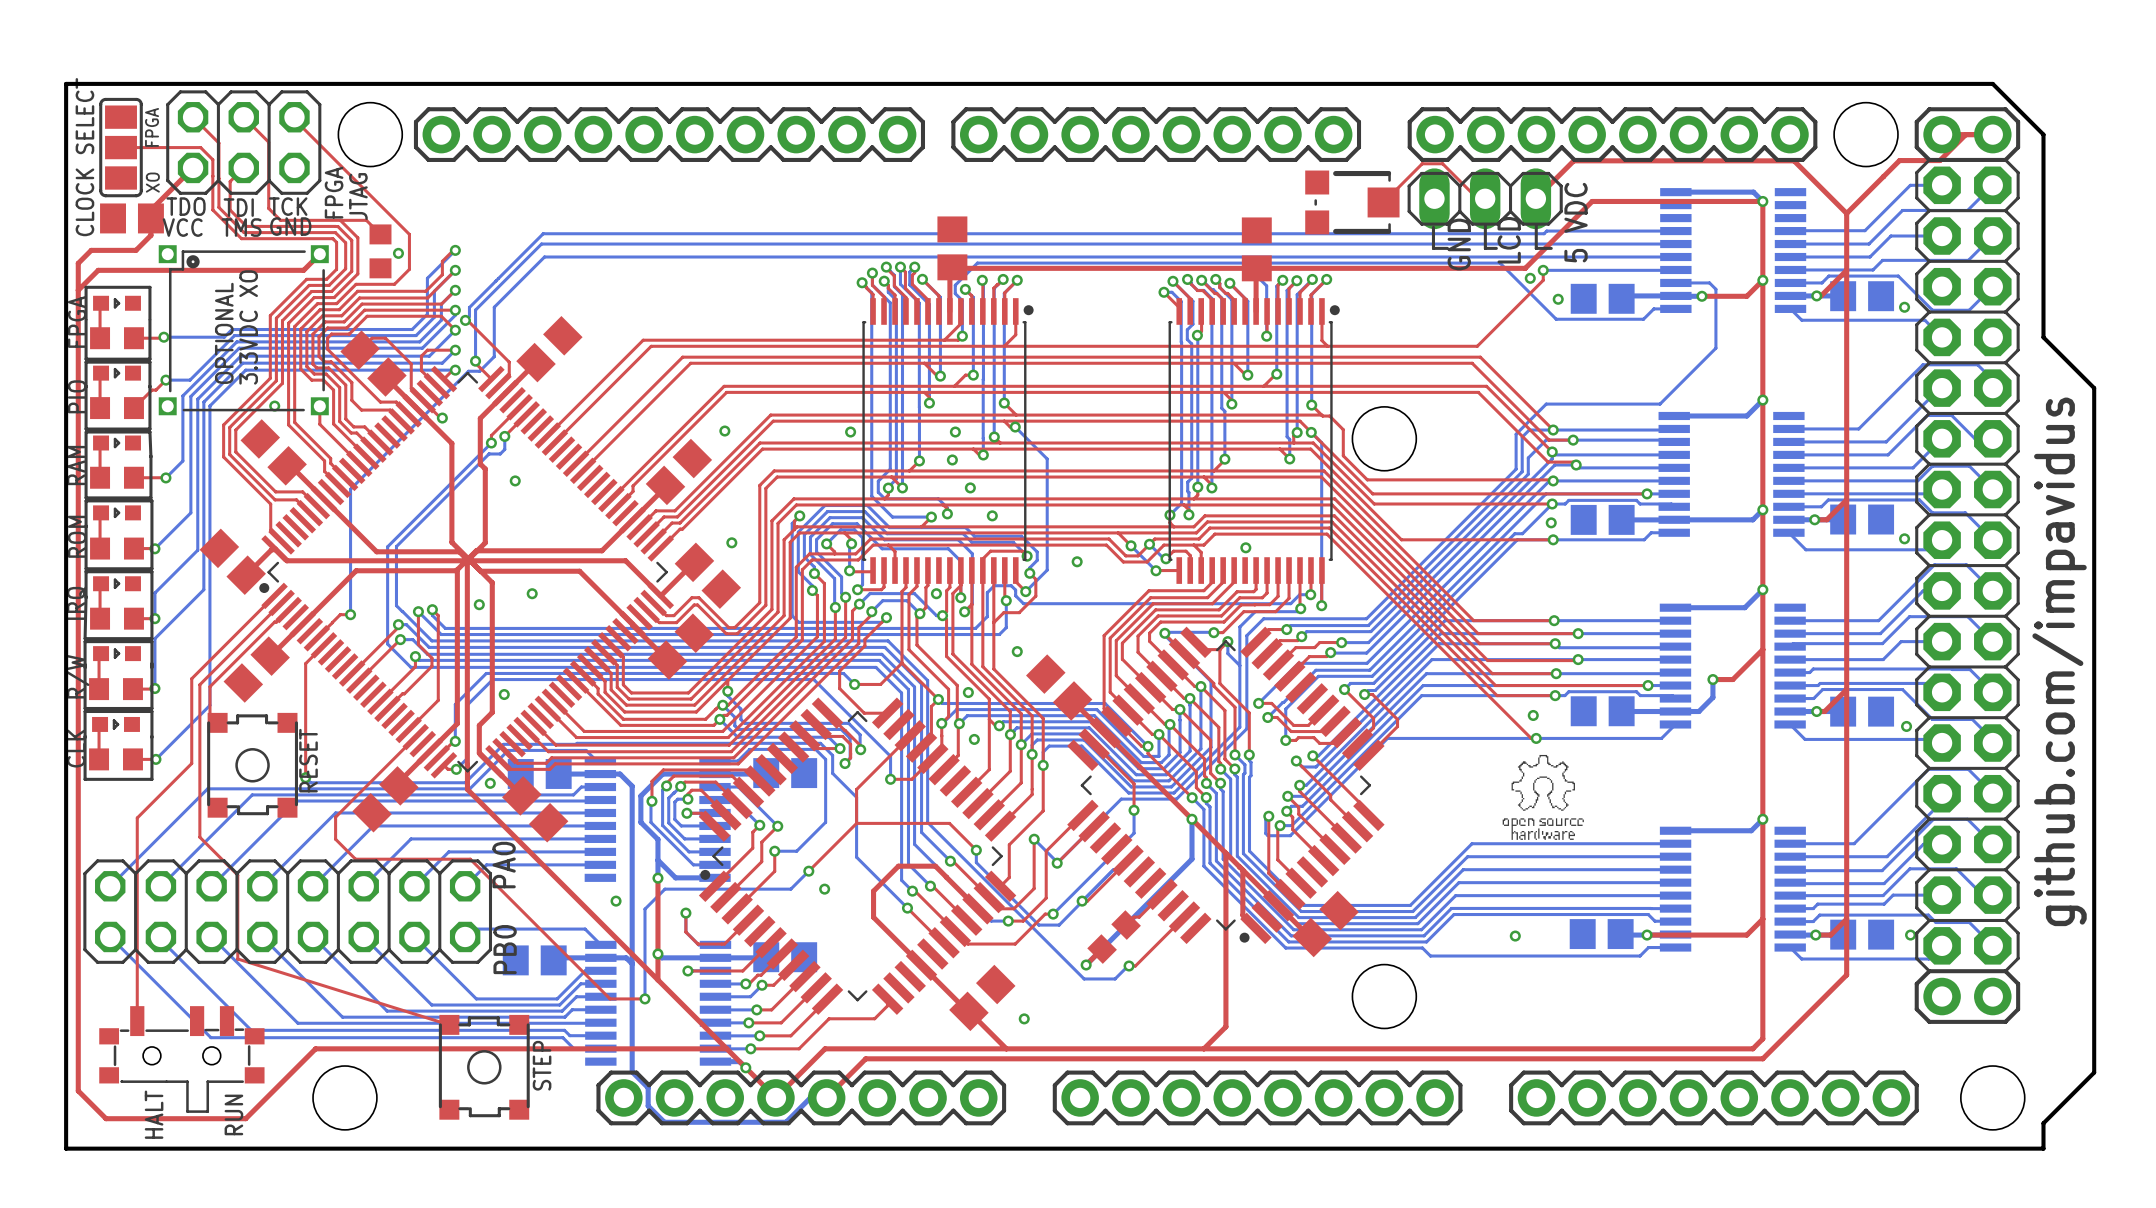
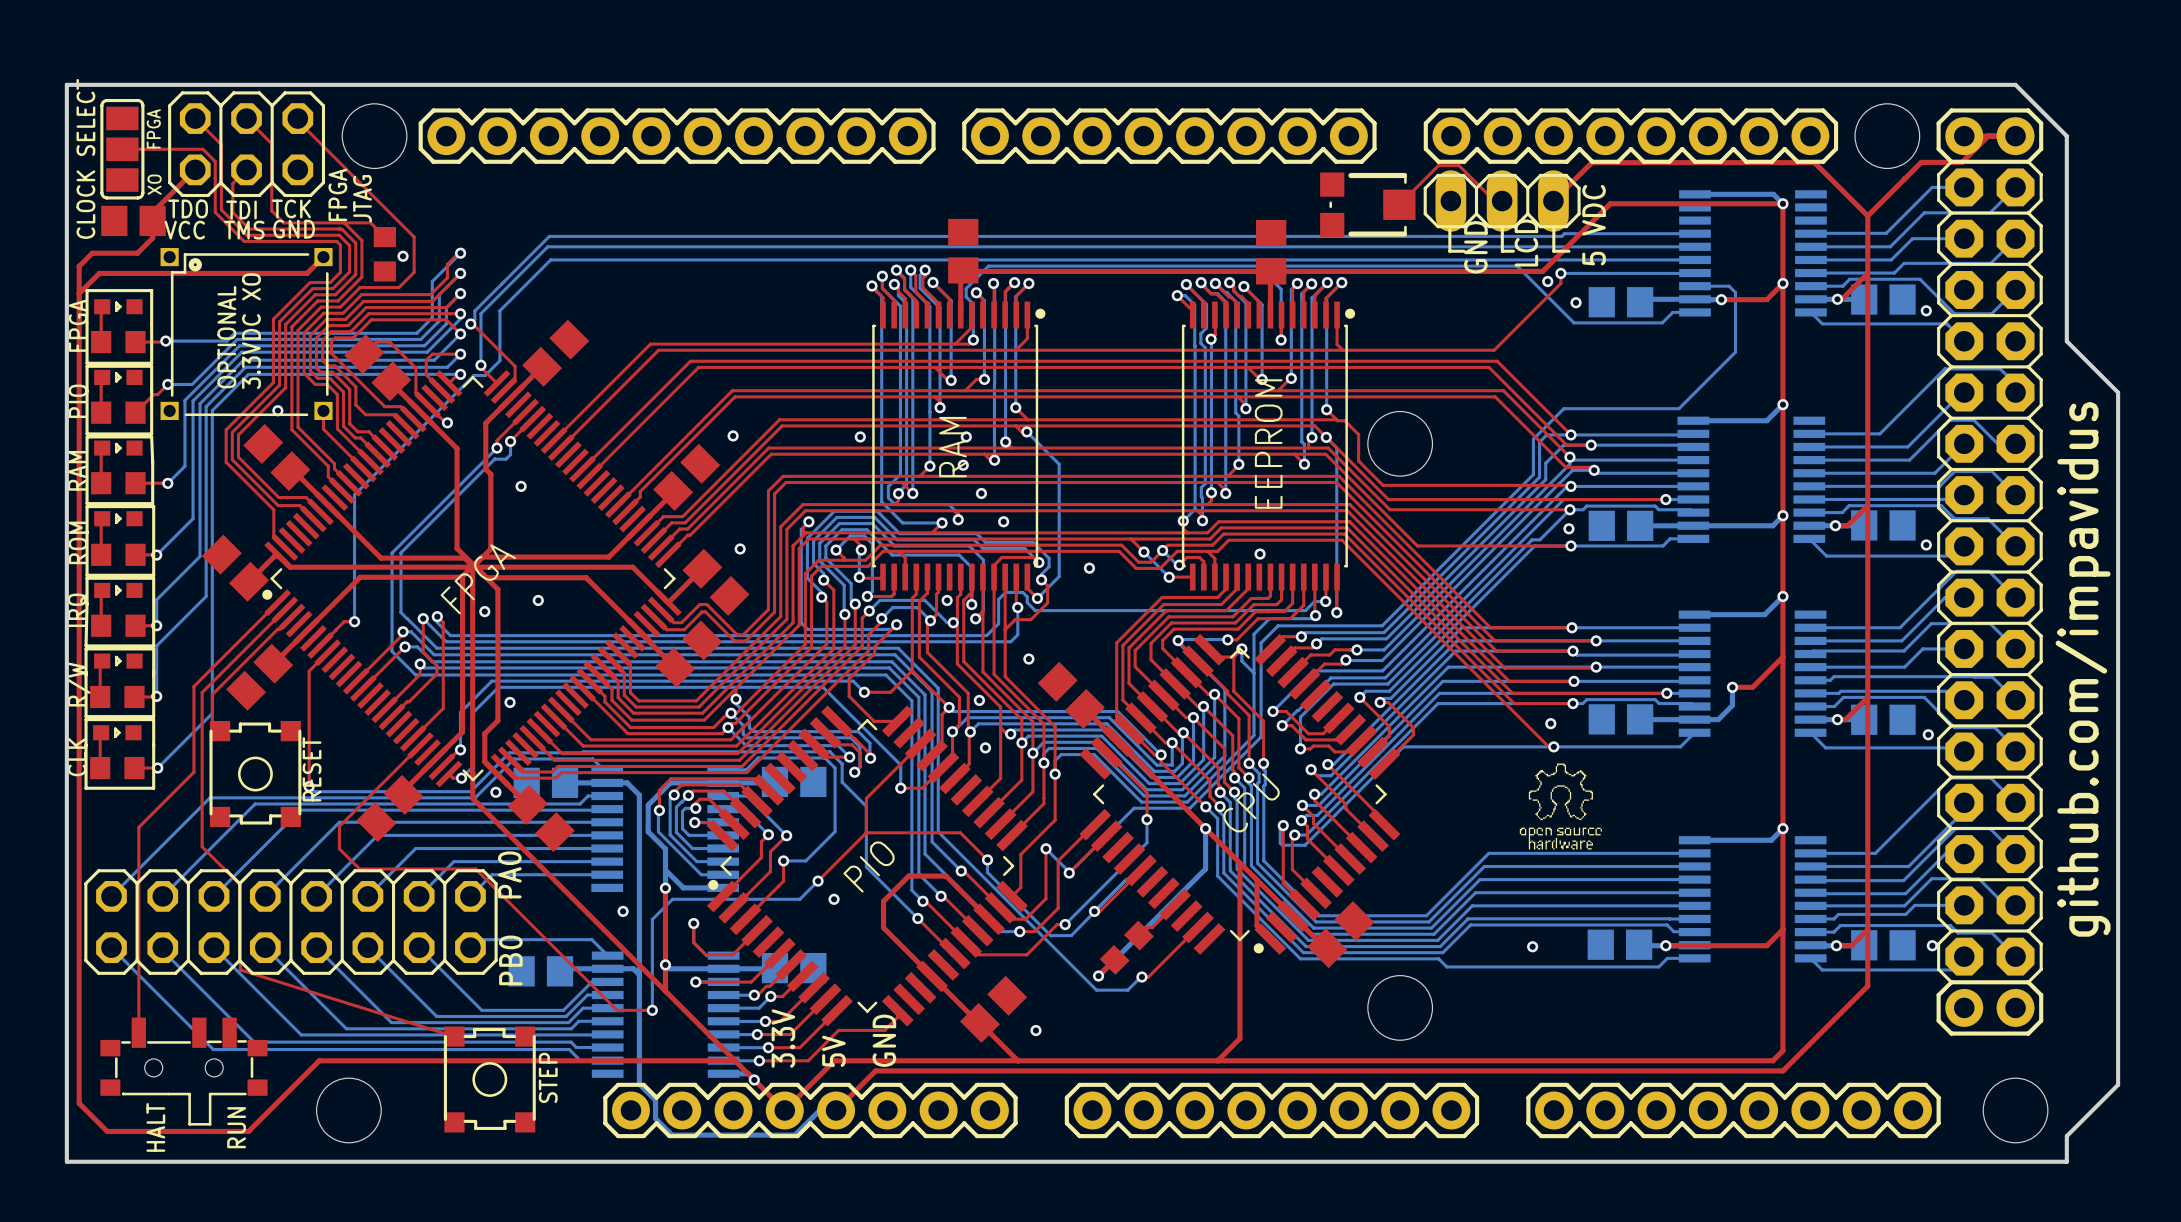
EEPROM name: none -> EEPROM (1268, 444)
RAM name: none -> RAM (952, 447)
FPGA name: none -> FPGA (478, 579)
CPU name: none -> CPU (1251, 802)
PIO name: none -> PIO (869, 867)
text: none -> 3.3V (783, 1038)
text: none -> GND (884, 1040)
text: none -> 5V (833, 1051)

